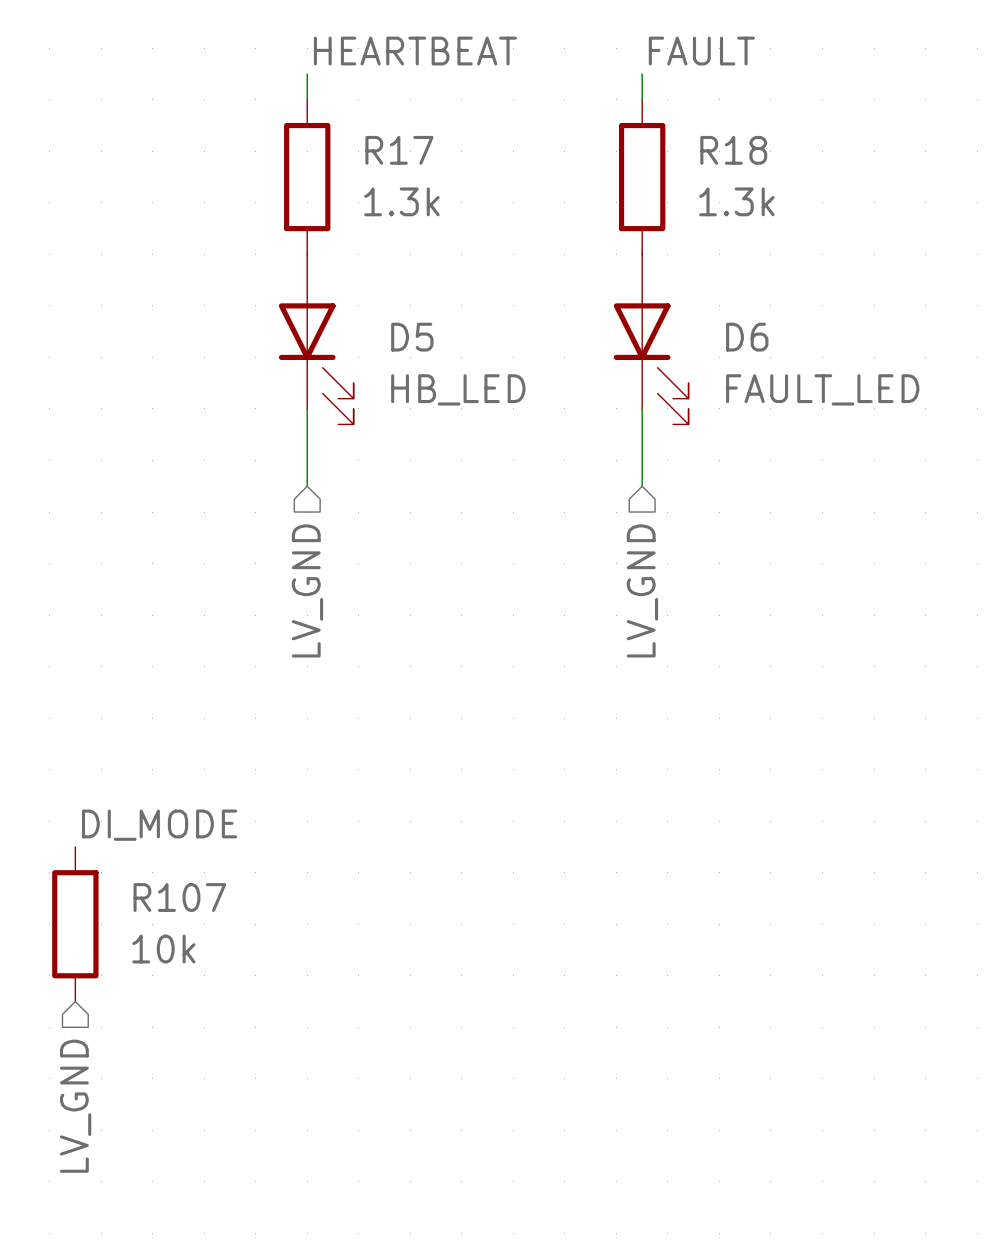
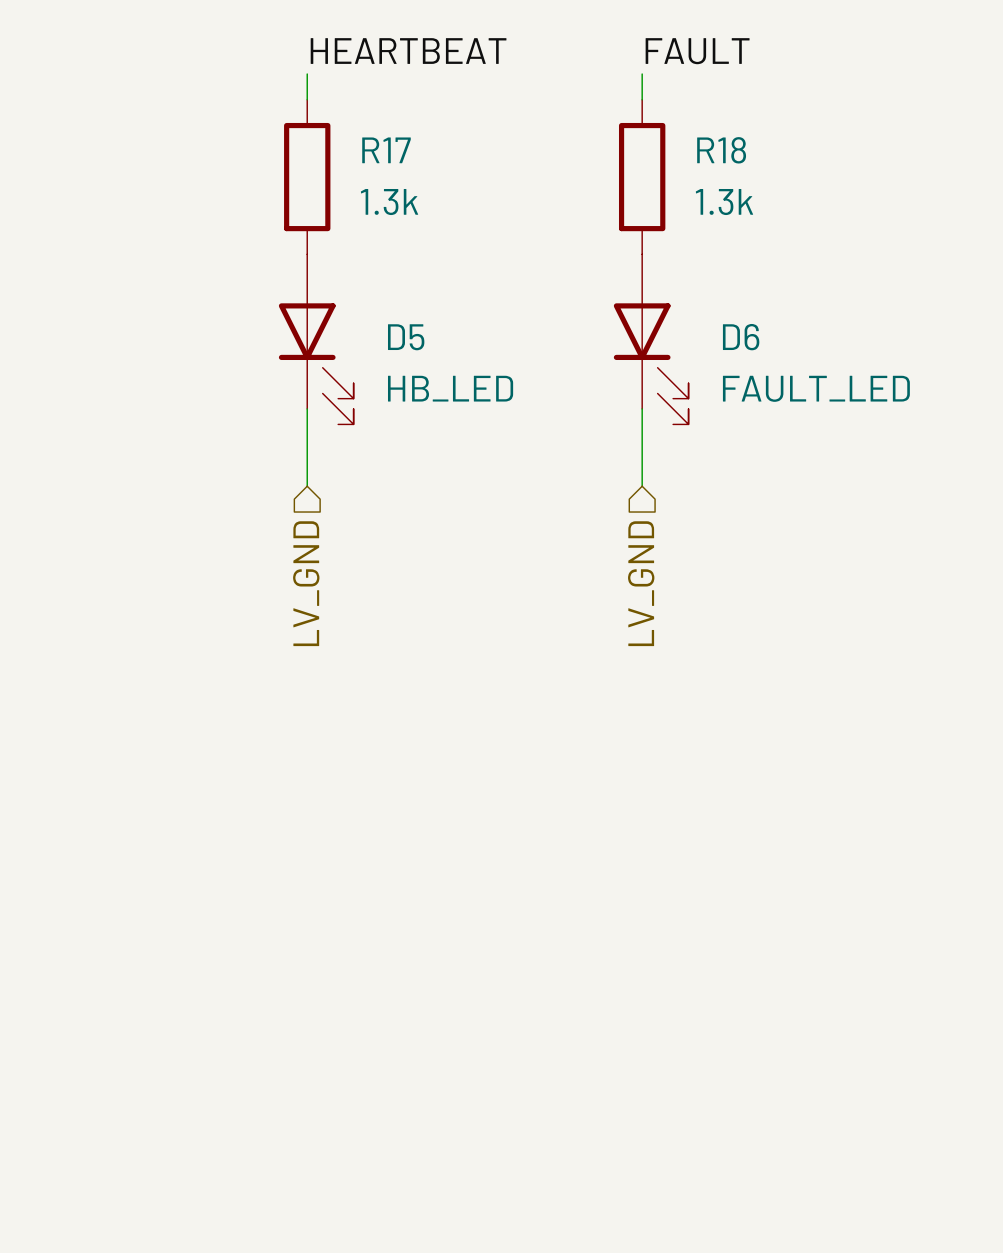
label: DI_MODE (159, 825) -> none
R107: 10k (75, 924) -> none
hierarchical label: LV_GND (75, 1106) -> none

